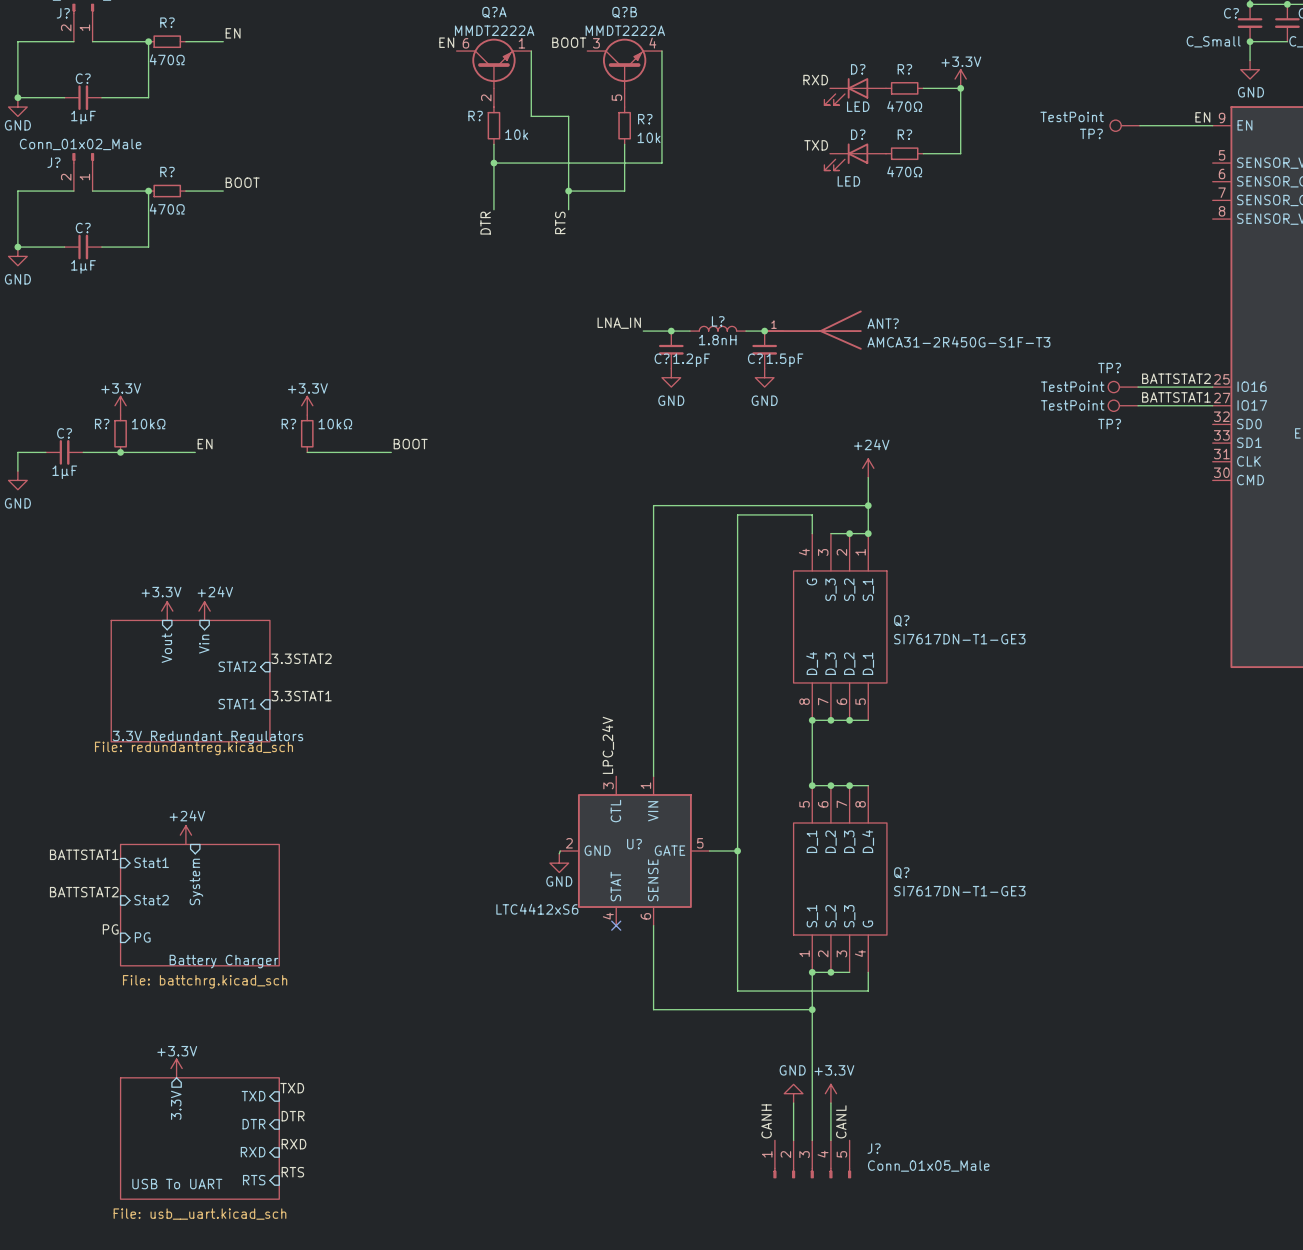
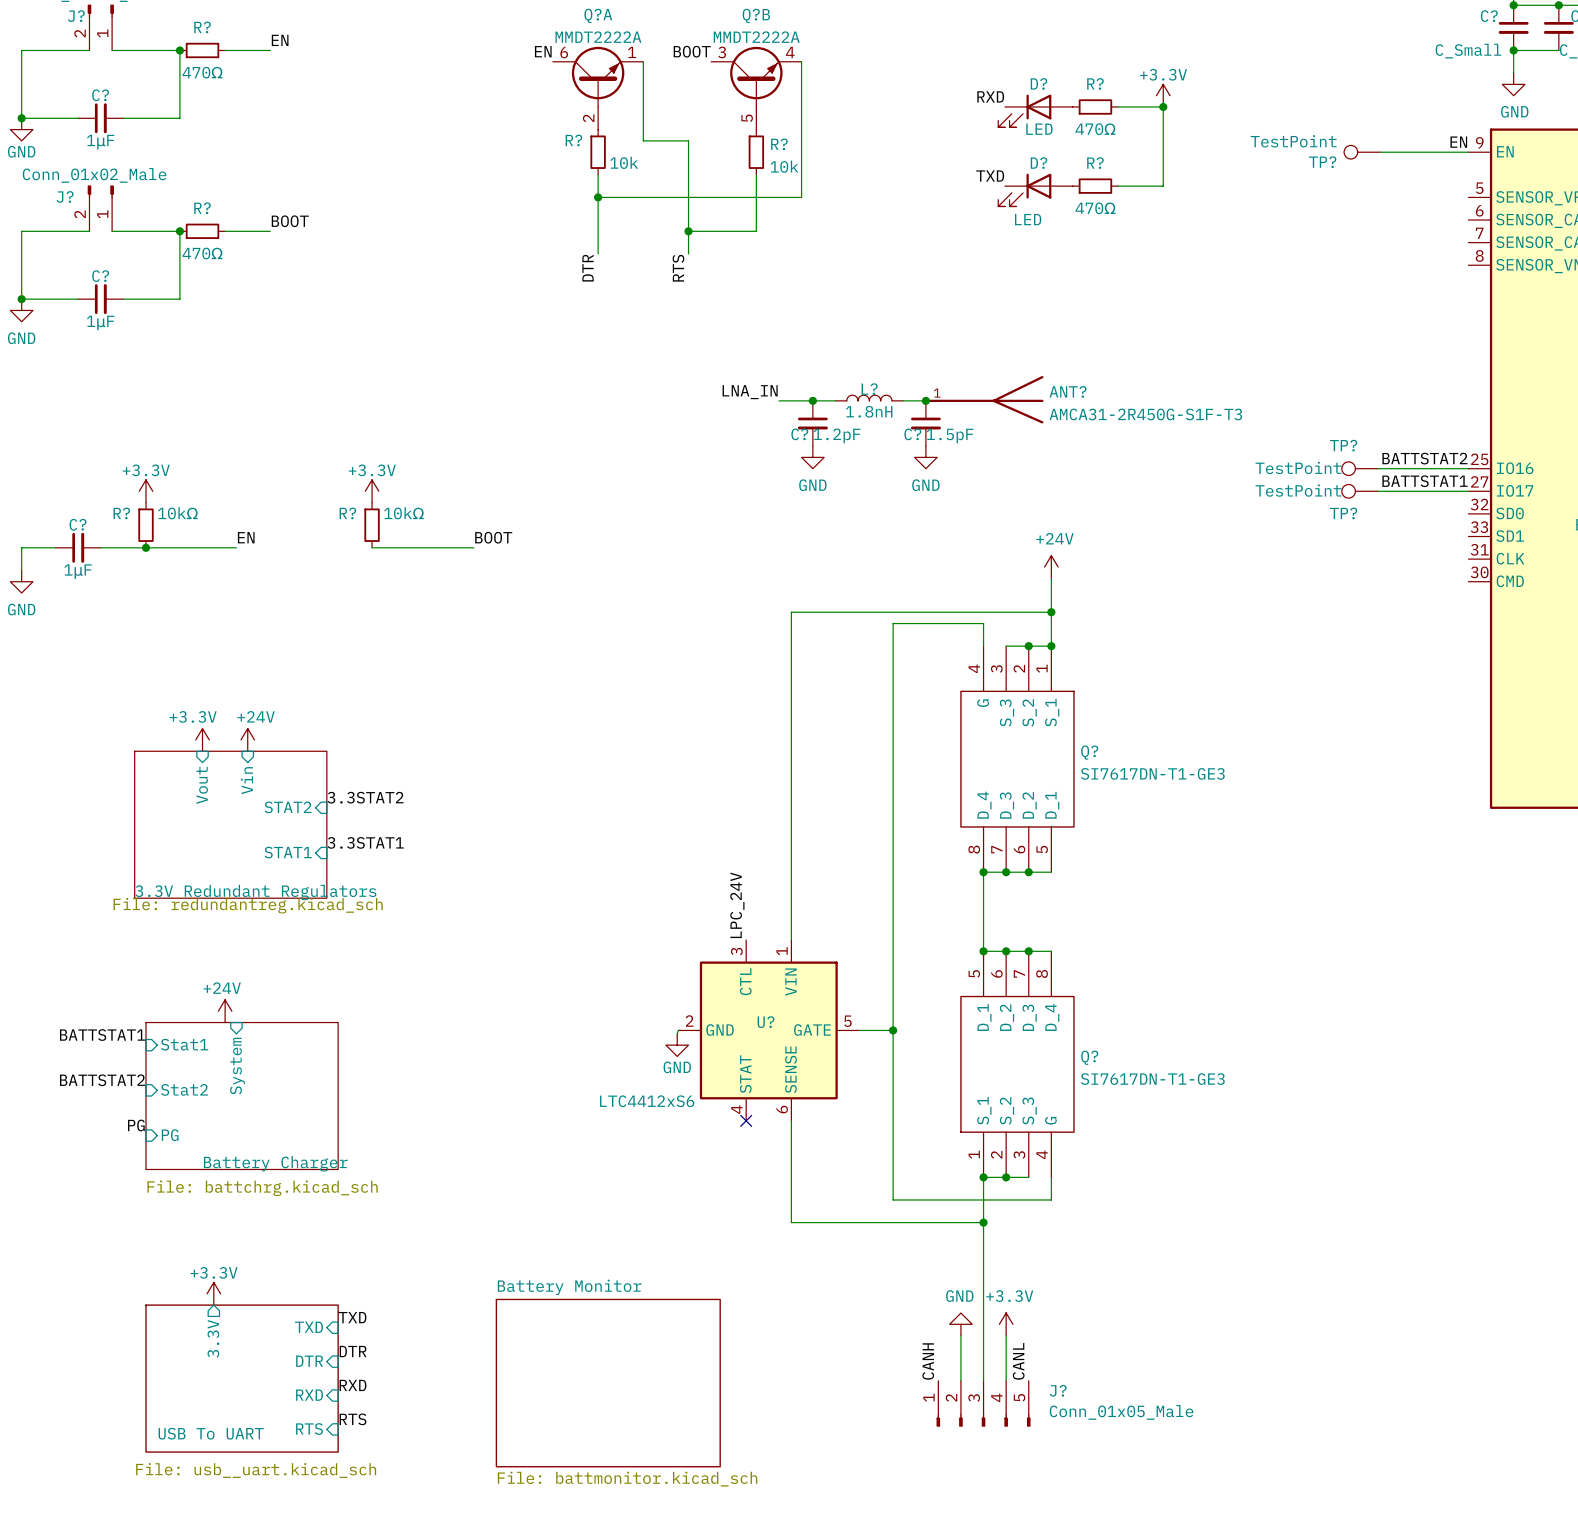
sheet Battery Monitor: none -> File: battmonitor.kicad_sch (608, 1383)

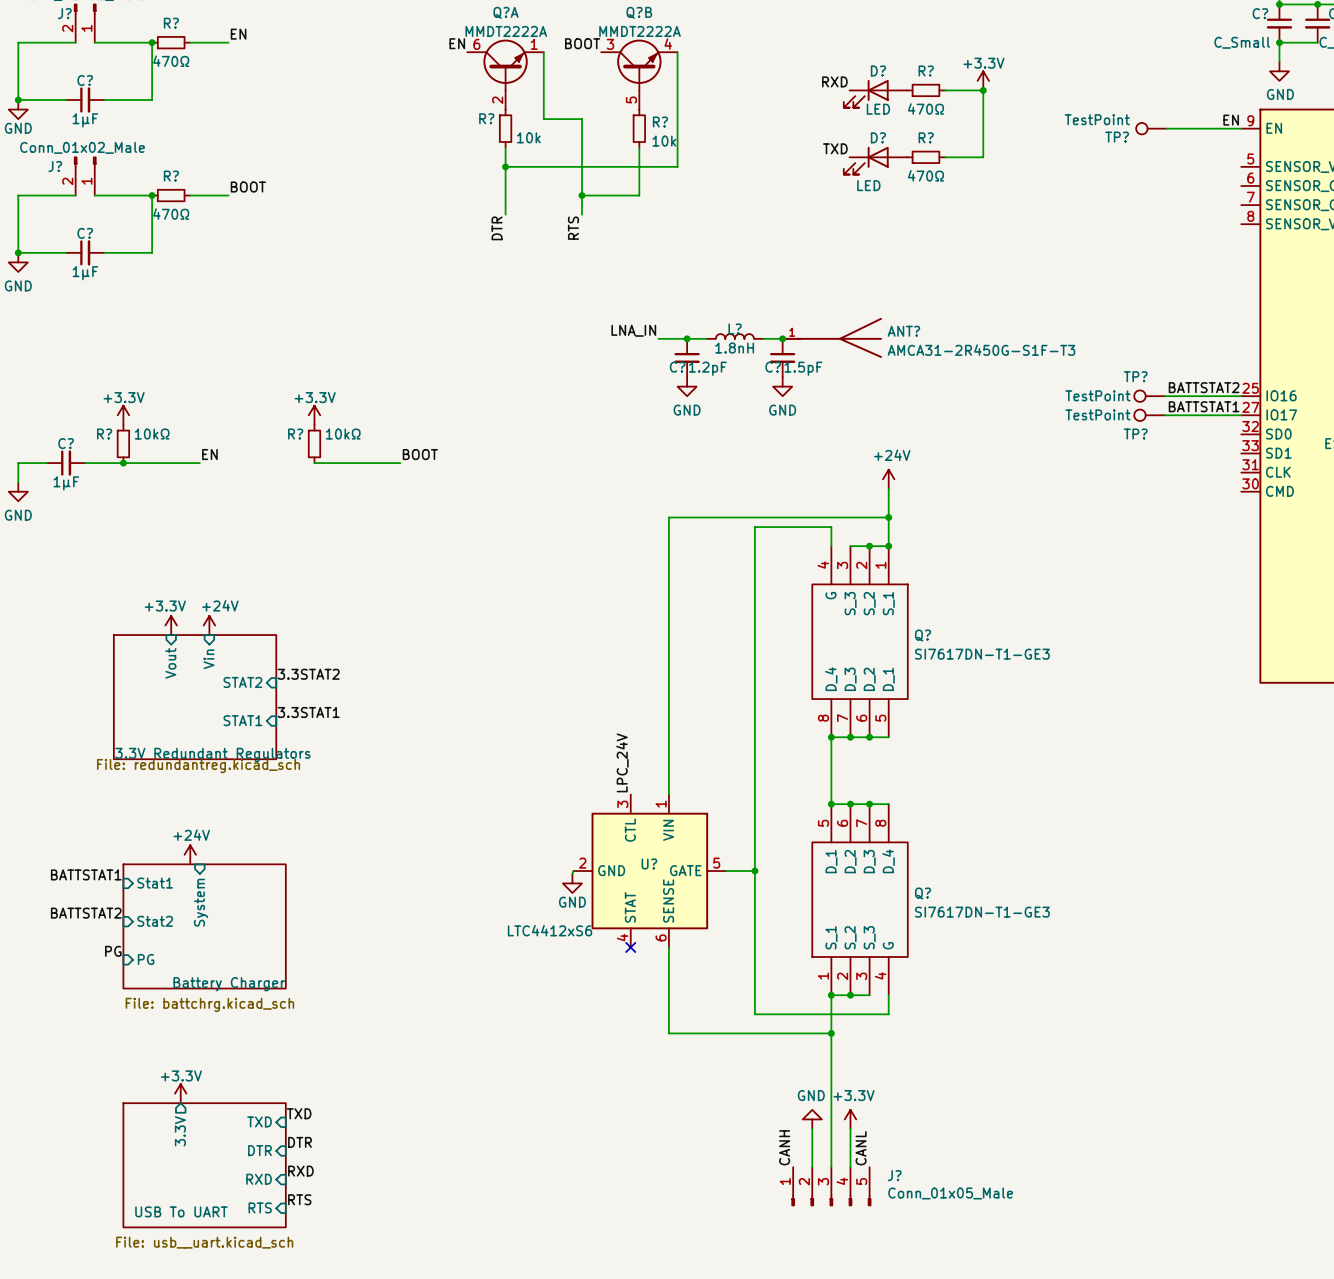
sheet Battery Monitor: File: battmonitor.kicad_sch (608, 1383) -> none

